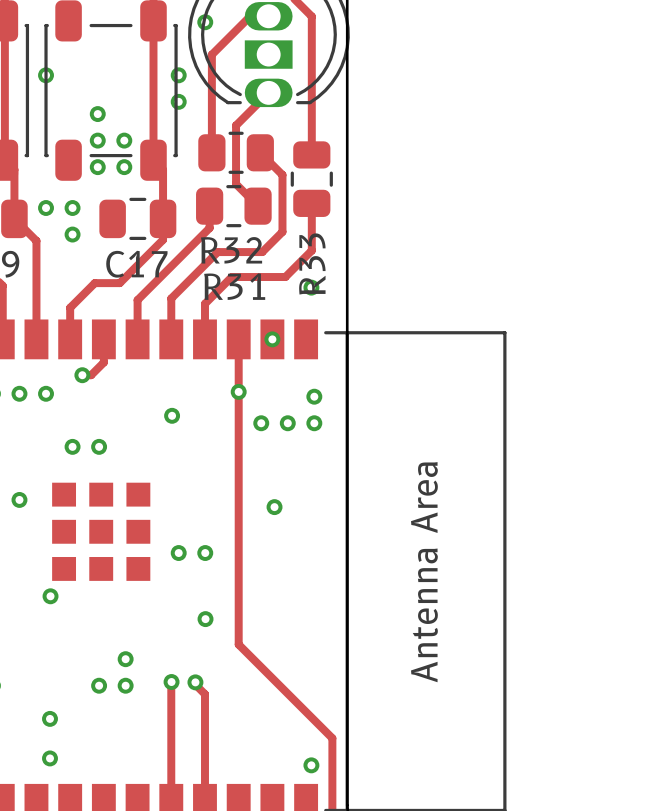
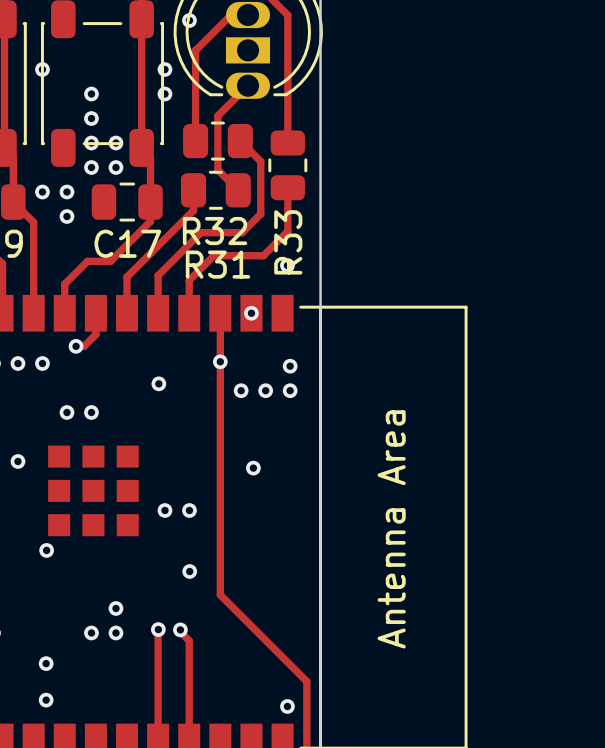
via: none -> (91, 94)
via: (97, 114) -> none
via: none -> (91, 118)
via: (97, 140) -> none
via: (124, 140) -> none
via: none -> (91, 143)
via: none -> (115, 143)
via: (97, 167) -> none
via: (124, 167) -> none
via: none -> (91, 167)
via: none -> (115, 167)

